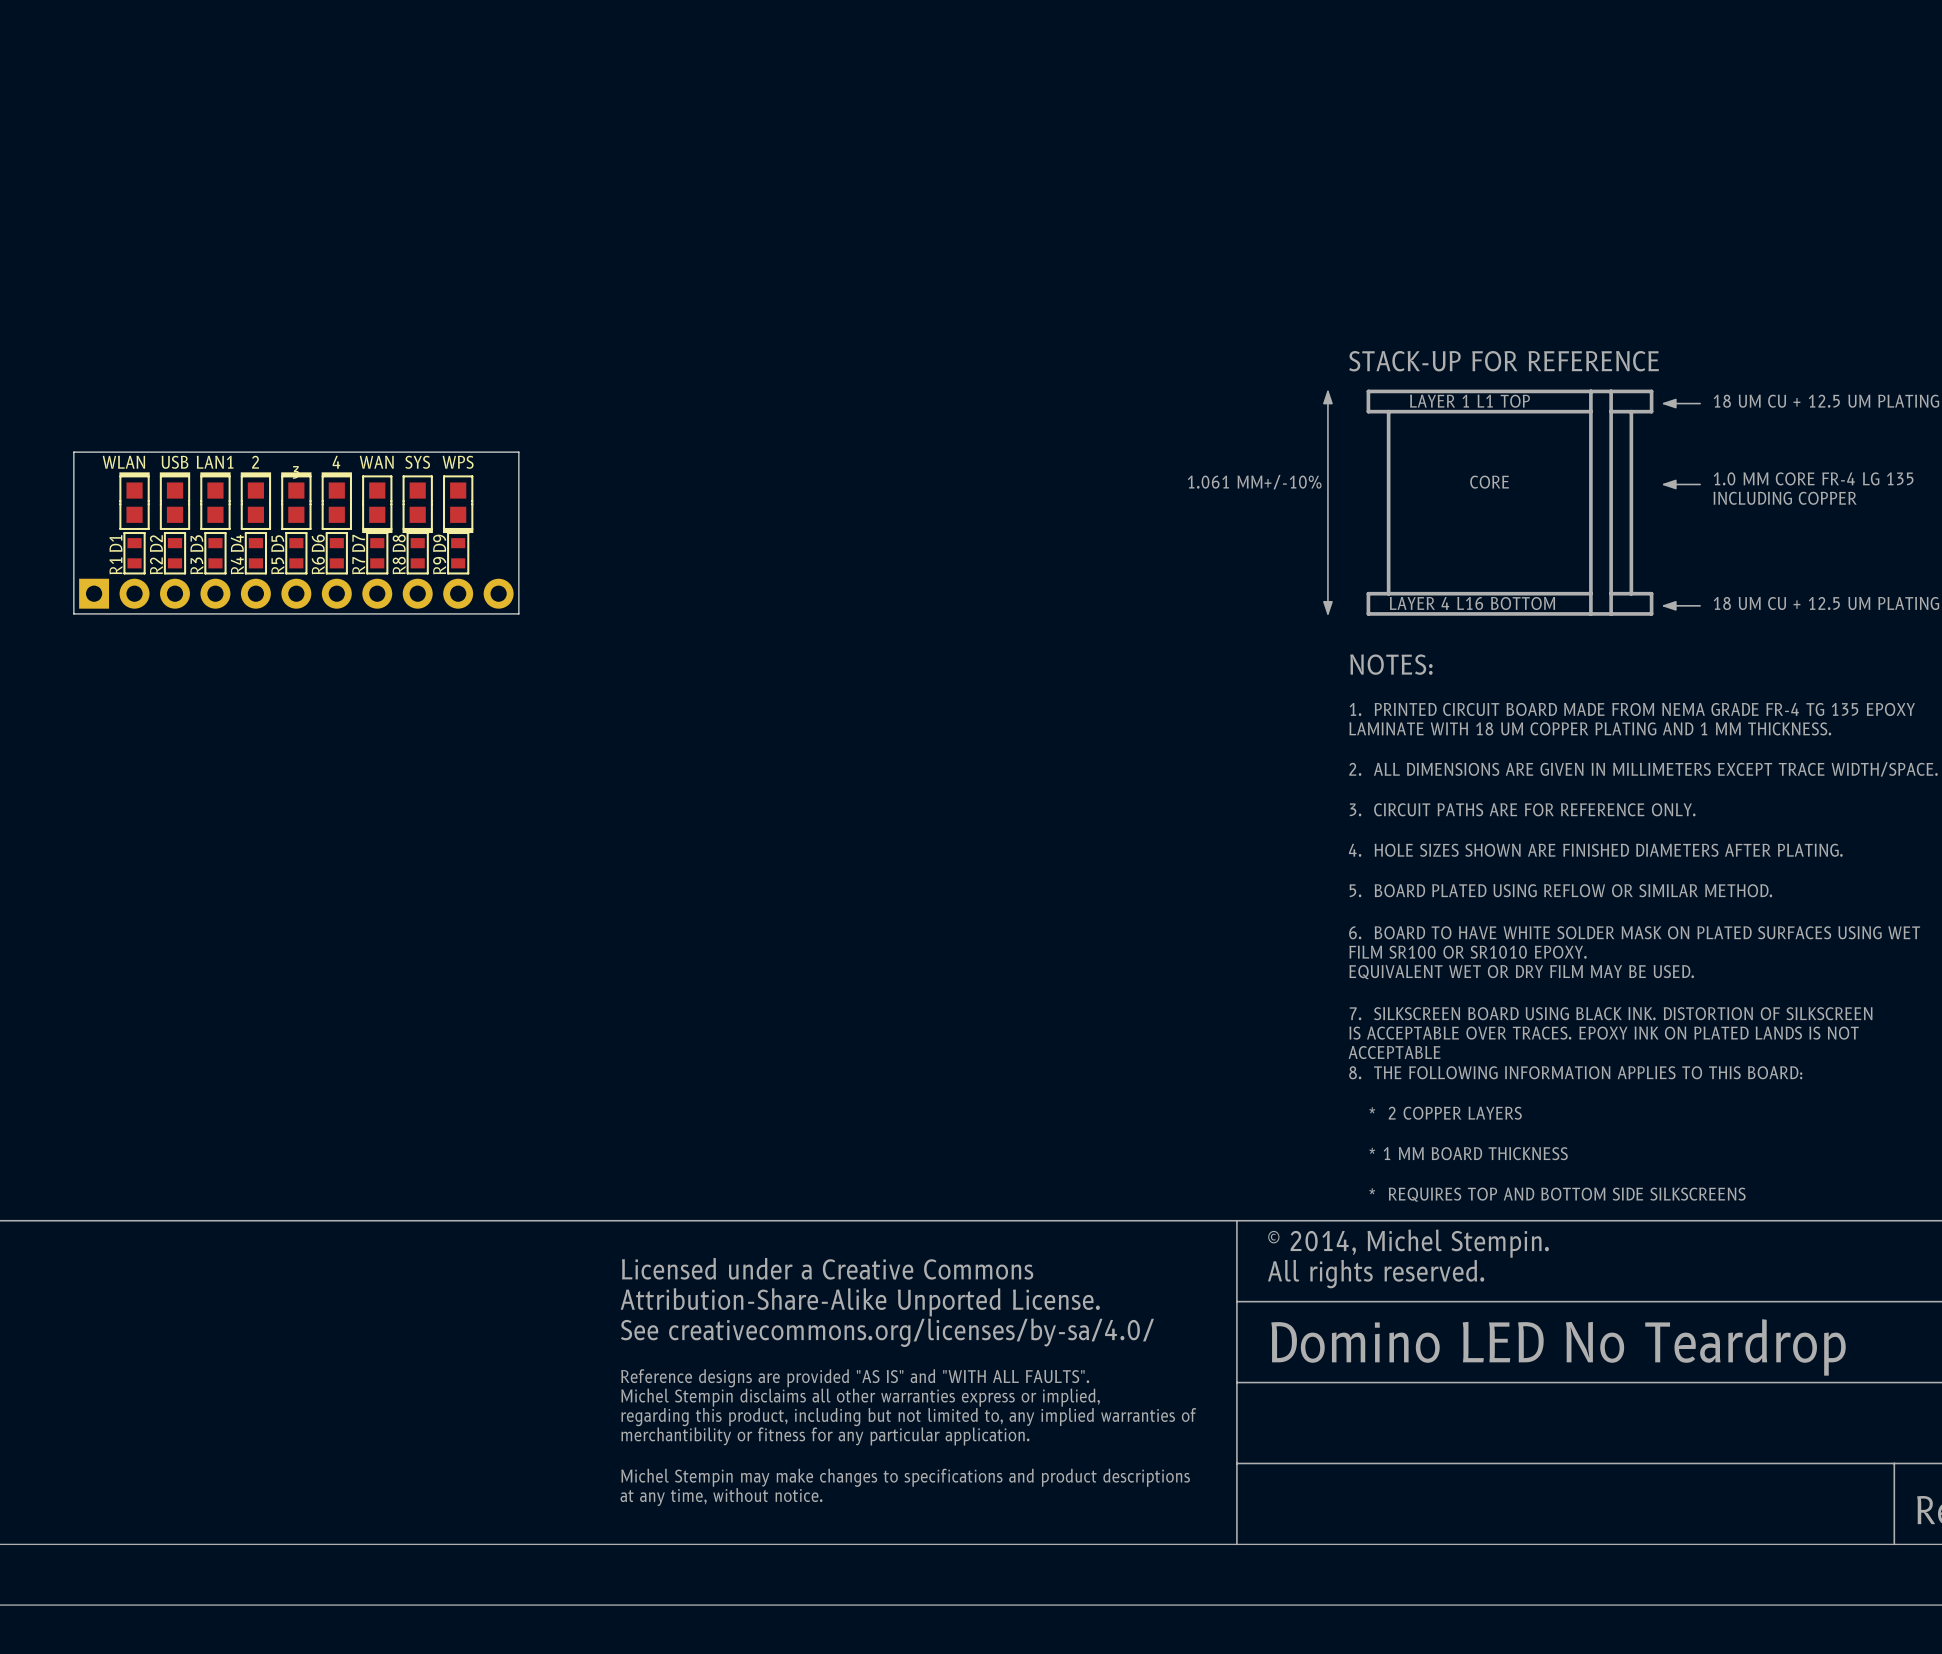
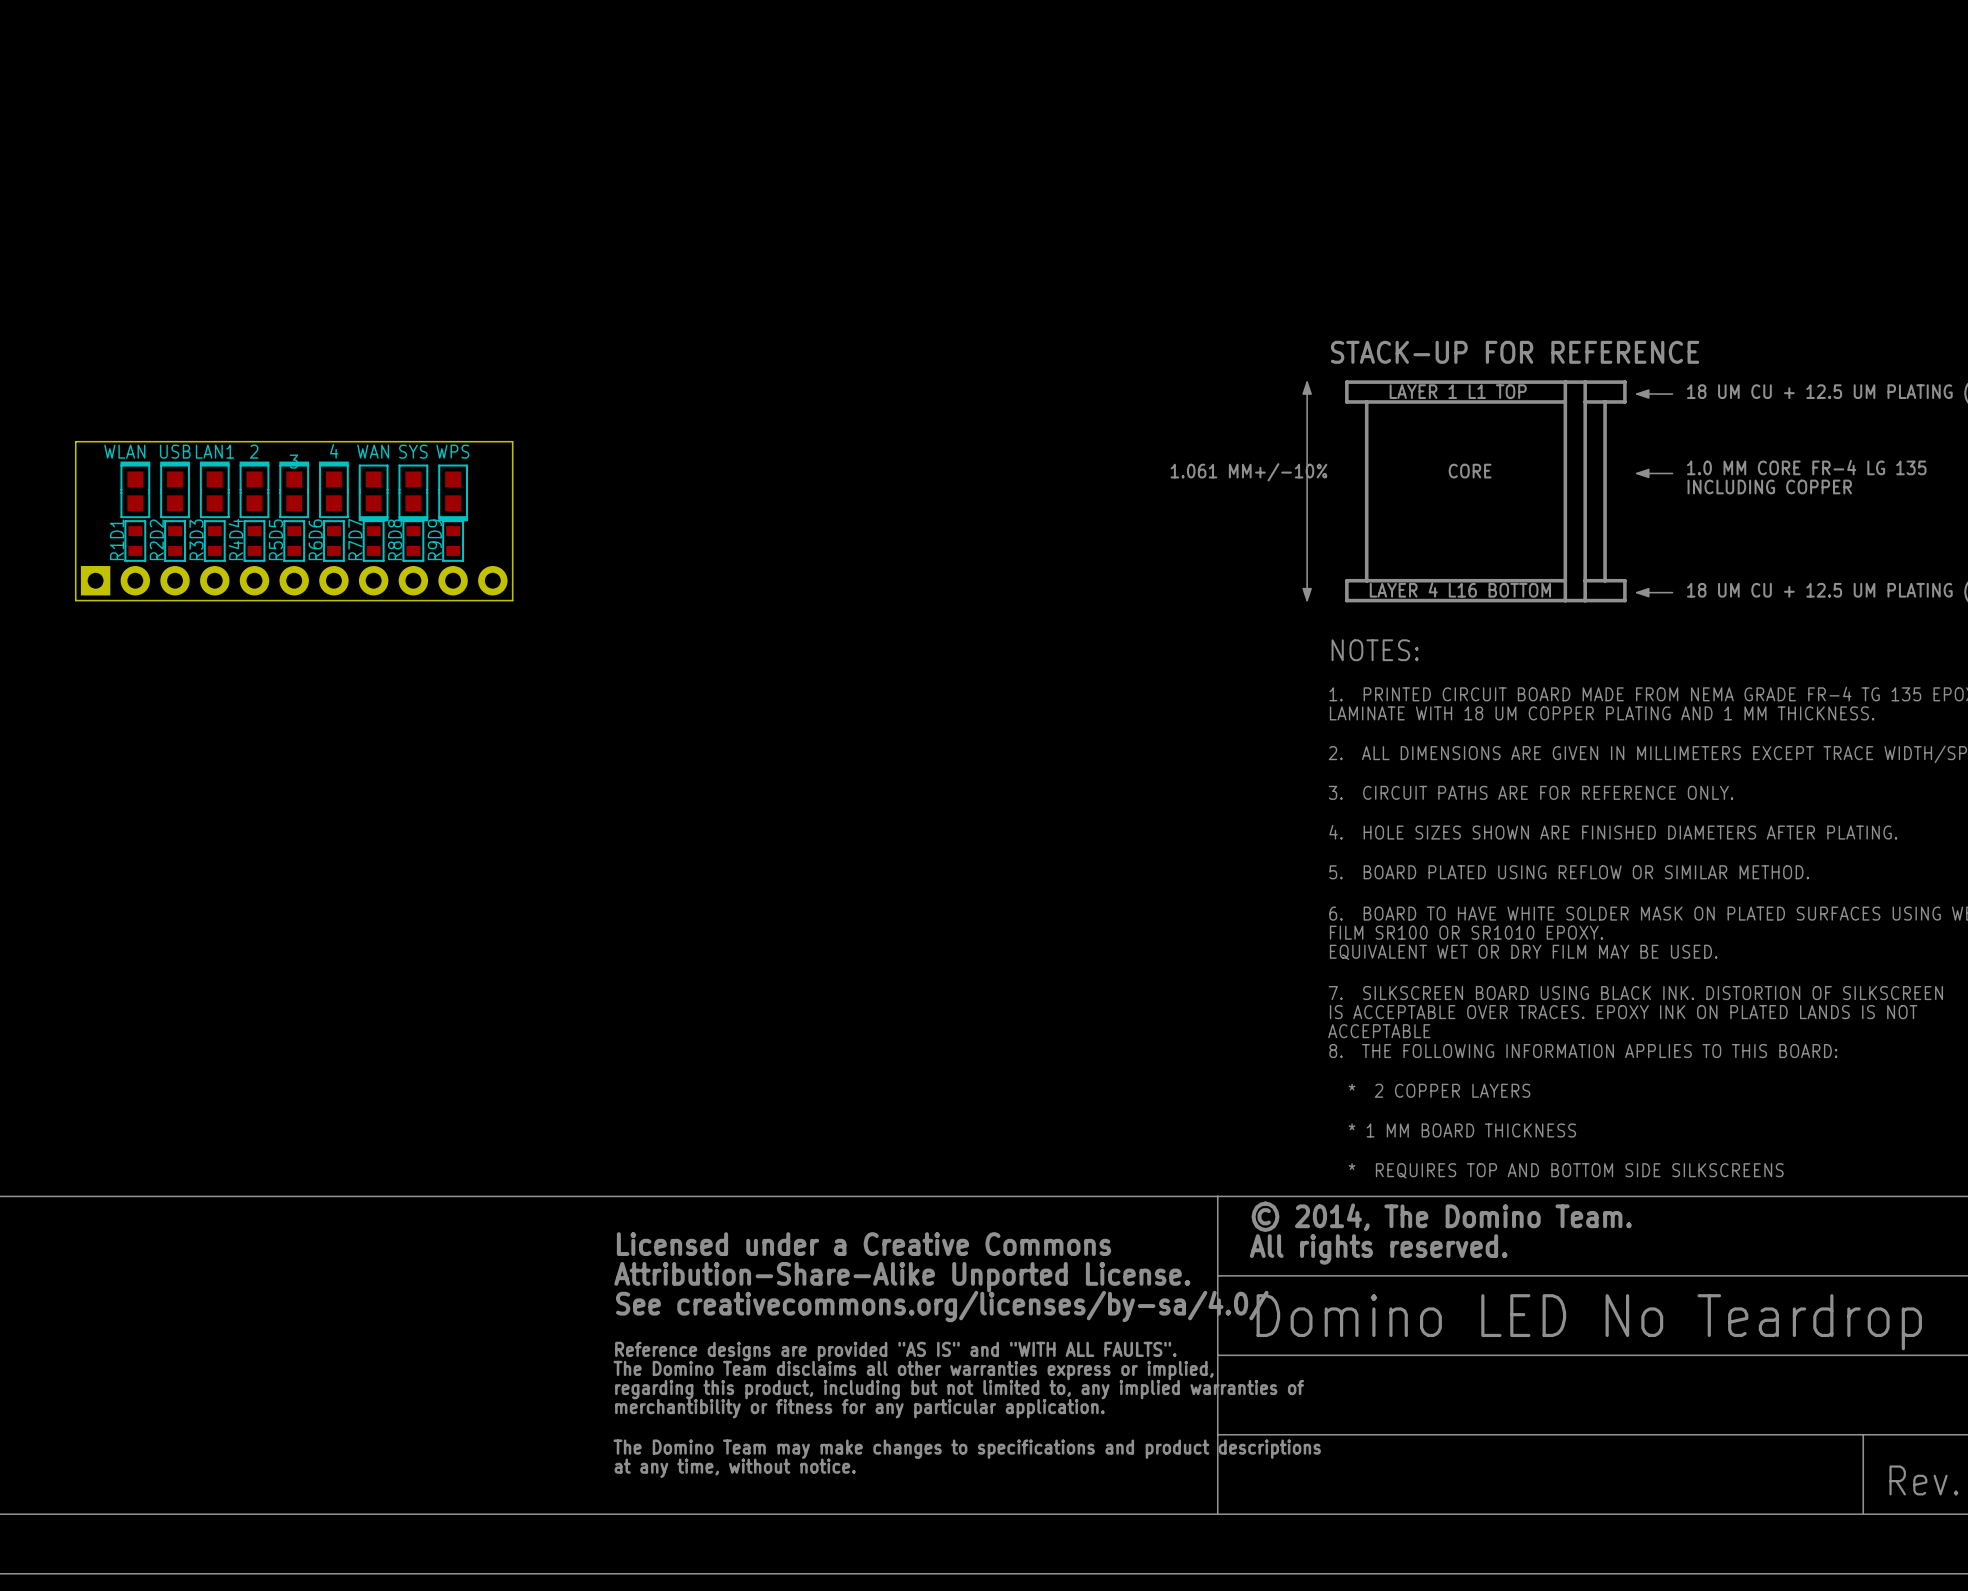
text: © 2014, Michel Stempin. (1408, 1243) -> © 2014, The Domino Team. (1441, 1216)
text: Michel Stempin disclaims all other warranties express or implied, (860, 1397) -> The Domino Team disclaims all other warranties express or implied, (913, 1370)
text: Michel Stempin may make changes to specifications and product descriptions (905, 1477) -> The Domino Team may make changes to specifications and product descriptions (967, 1449)

